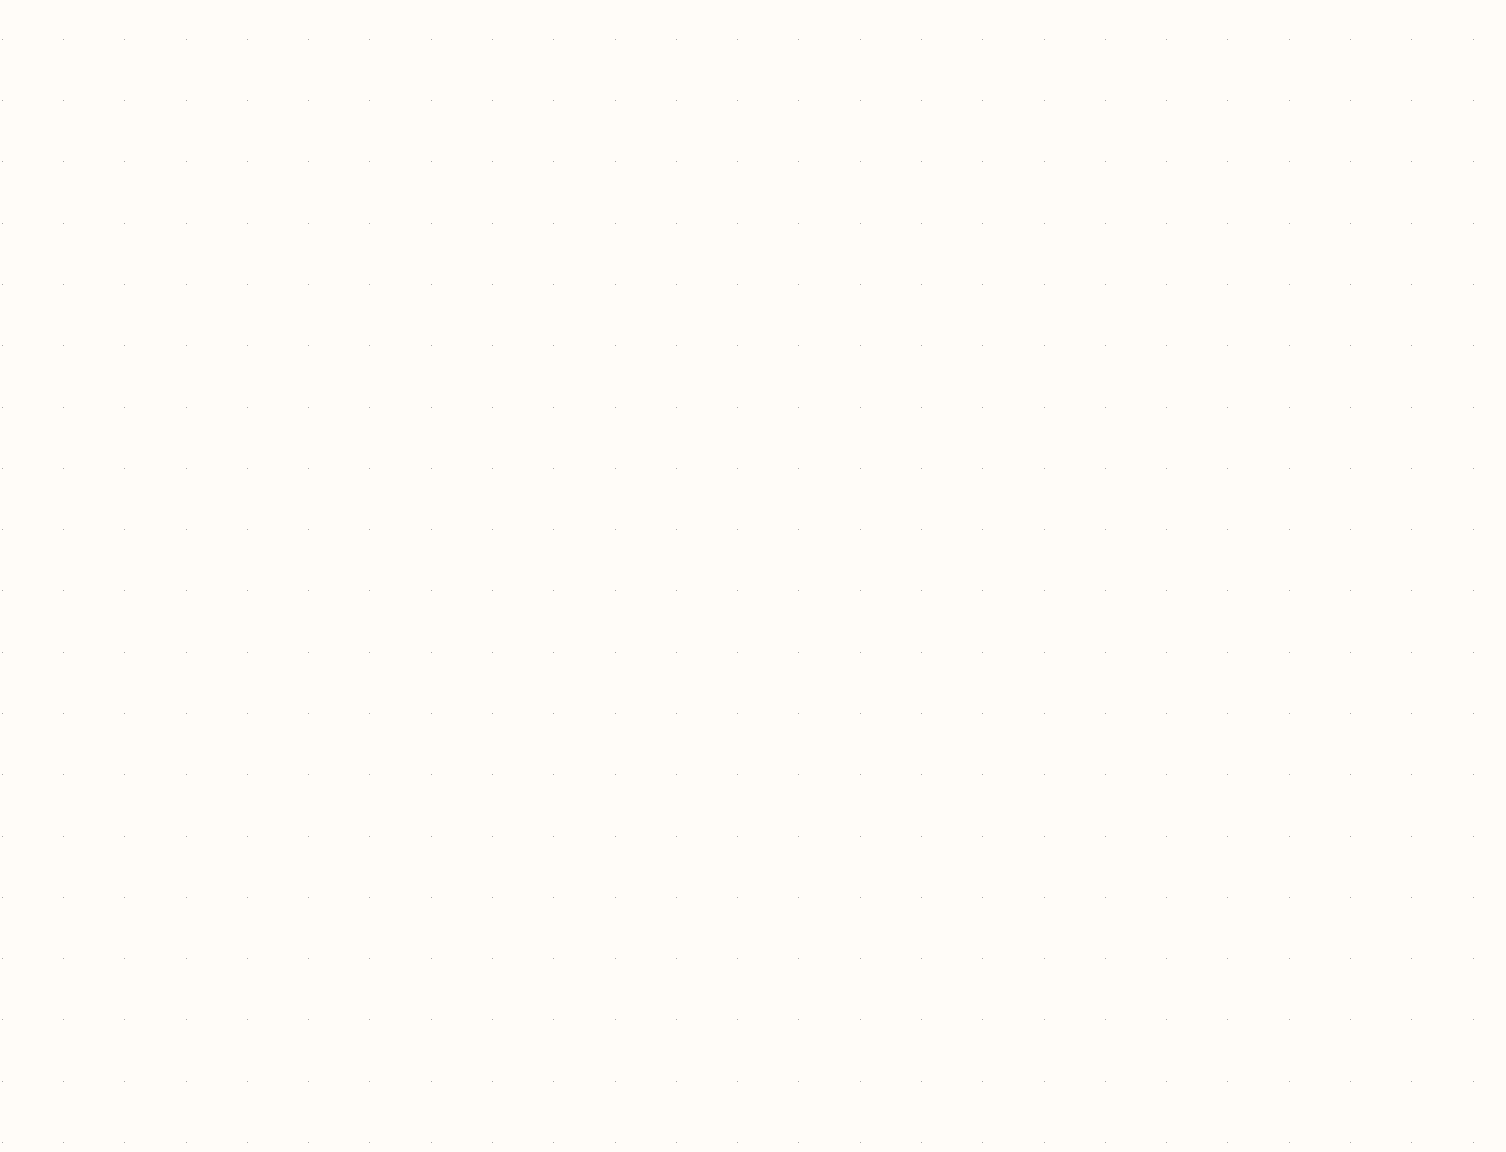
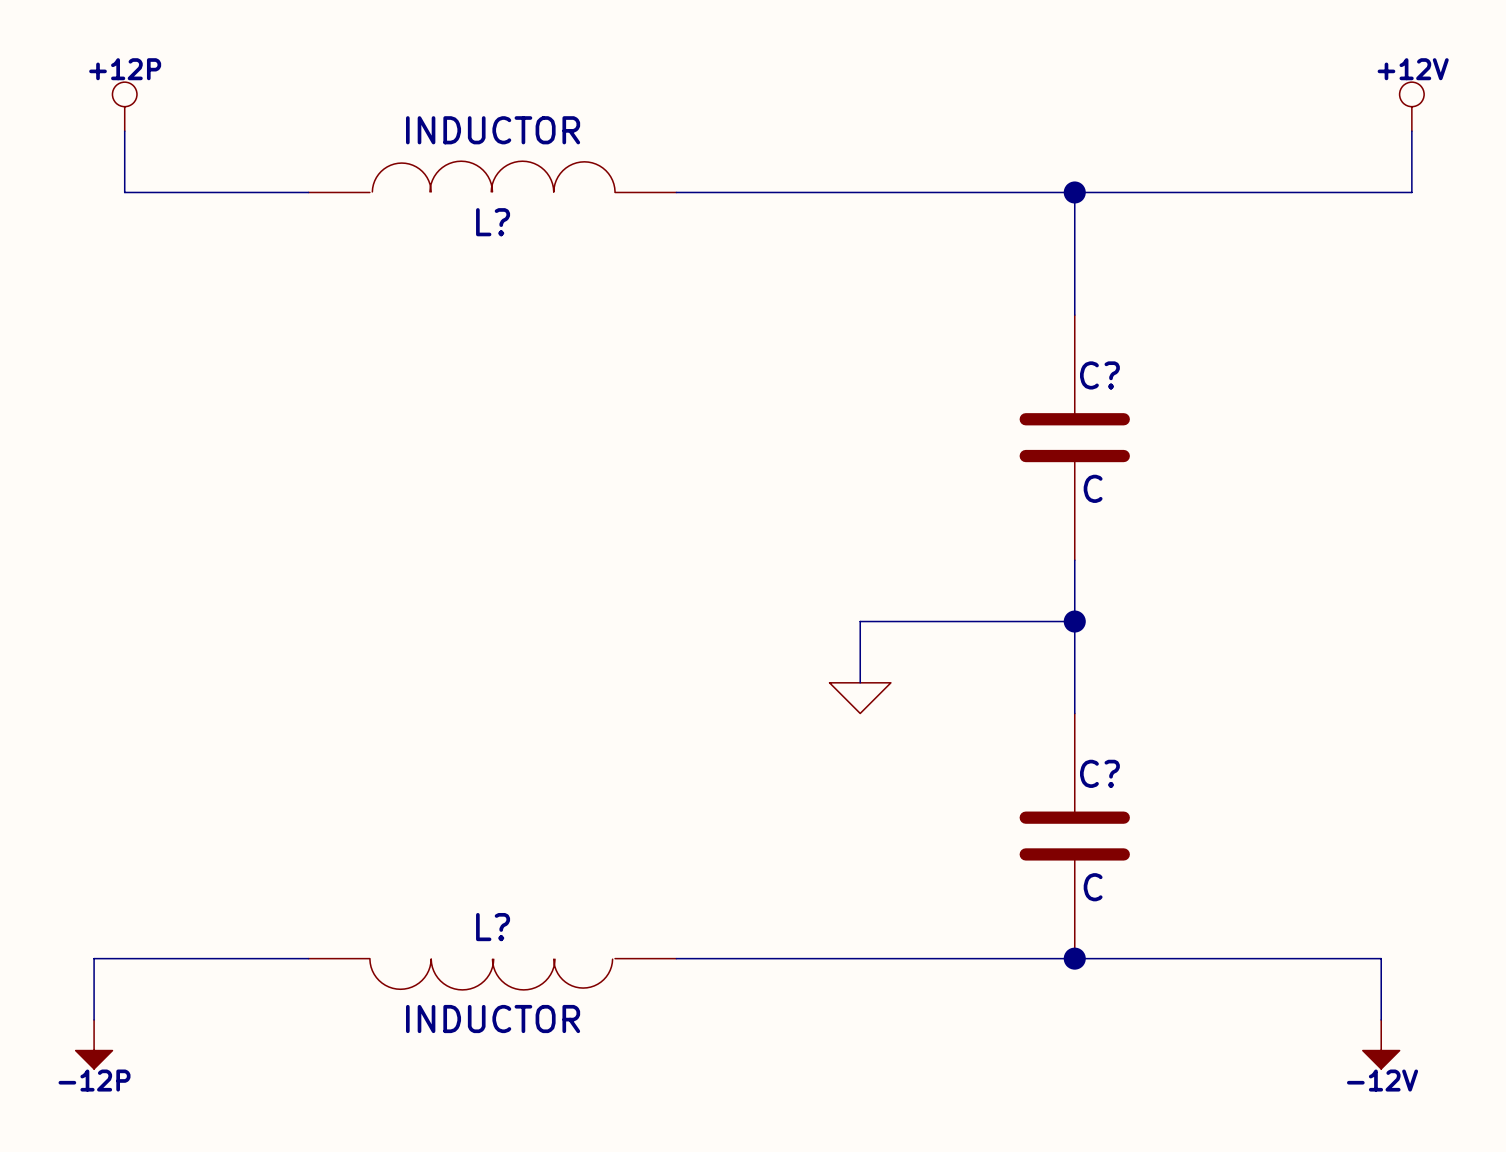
power symbol: none -> +12P (124, 106)
power symbol: none -> +12V (1411, 106)
wire: none -> (124, 131) (124, 192) (308, 192)
wire: none -> (1411, 131) (1411, 192) (676, 192)
L?: none -> INDUCTOR (492, 176)
wire: none -> (1074, 192) (1074, 315)
junction: none -> (1074, 192)
C?: none -> C (1074, 437)
wire: none -> (1074, 560) (1074, 713)
wire: none -> (1074, 621) (860, 621) (860, 682)
junction: none -> (1074, 621)
power symbol: none -> (860, 698)
C?: none -> C (1074, 836)
wire: none -> (308, 958) (94, 958) (94, 1019)
wire: none -> (676, 958) (1381, 958) (1381, 1019)
junction: none -> (1074, 958)
L?: none -> INDUCTOR (492, 974)
power symbol: none -> -12P (94, 1044)
power symbol: none -> -12V (1381, 1044)

